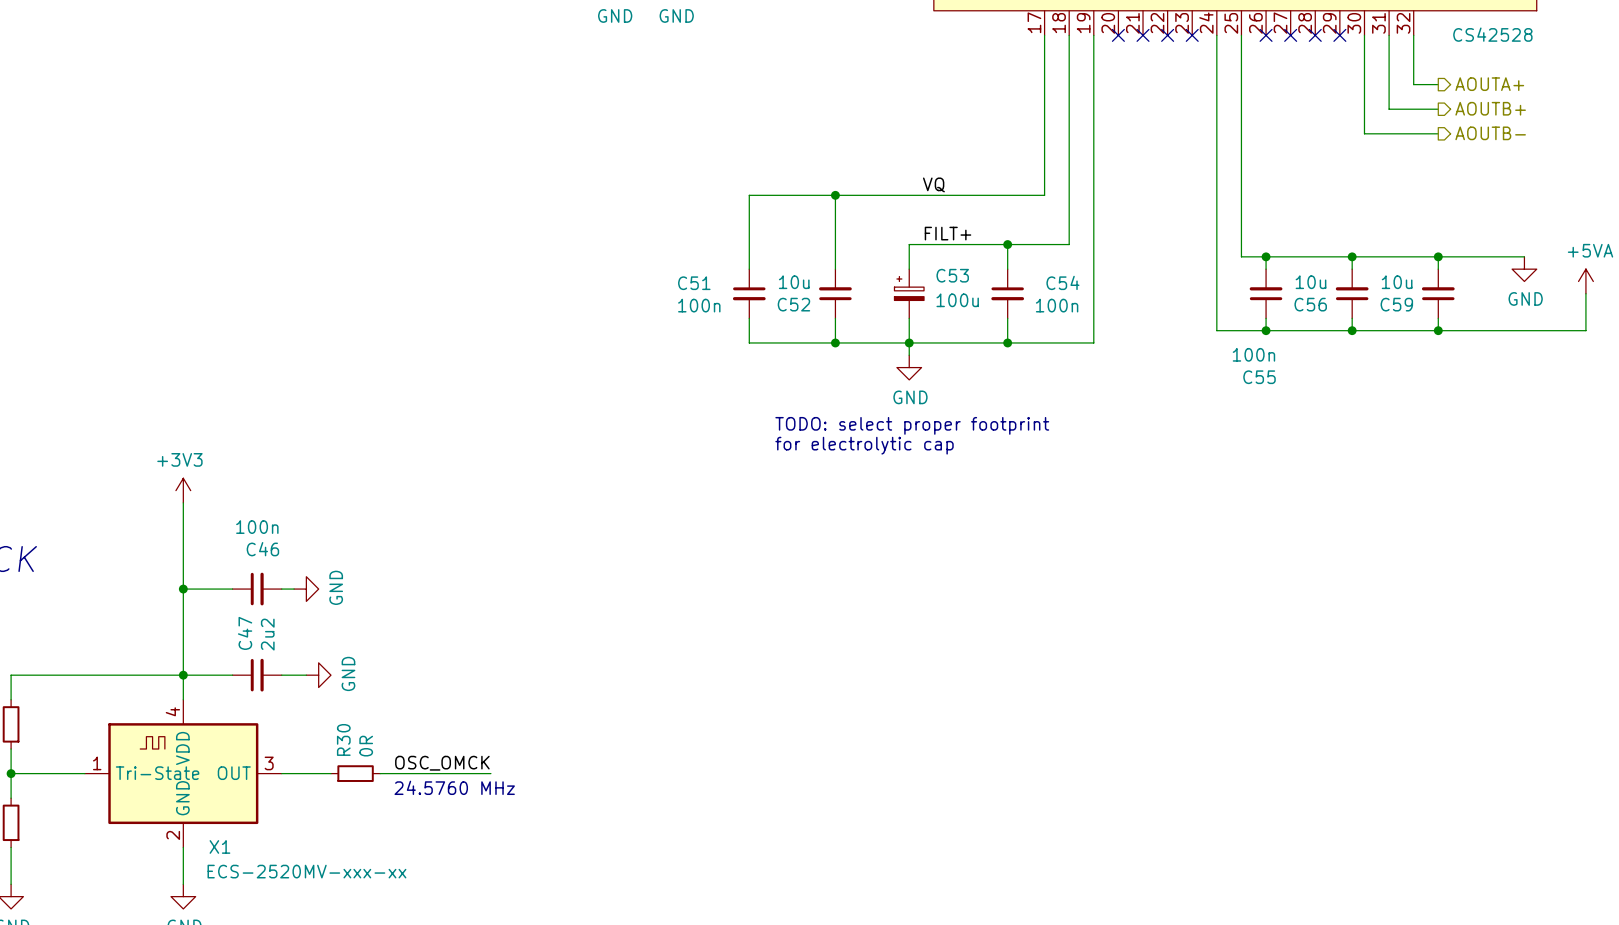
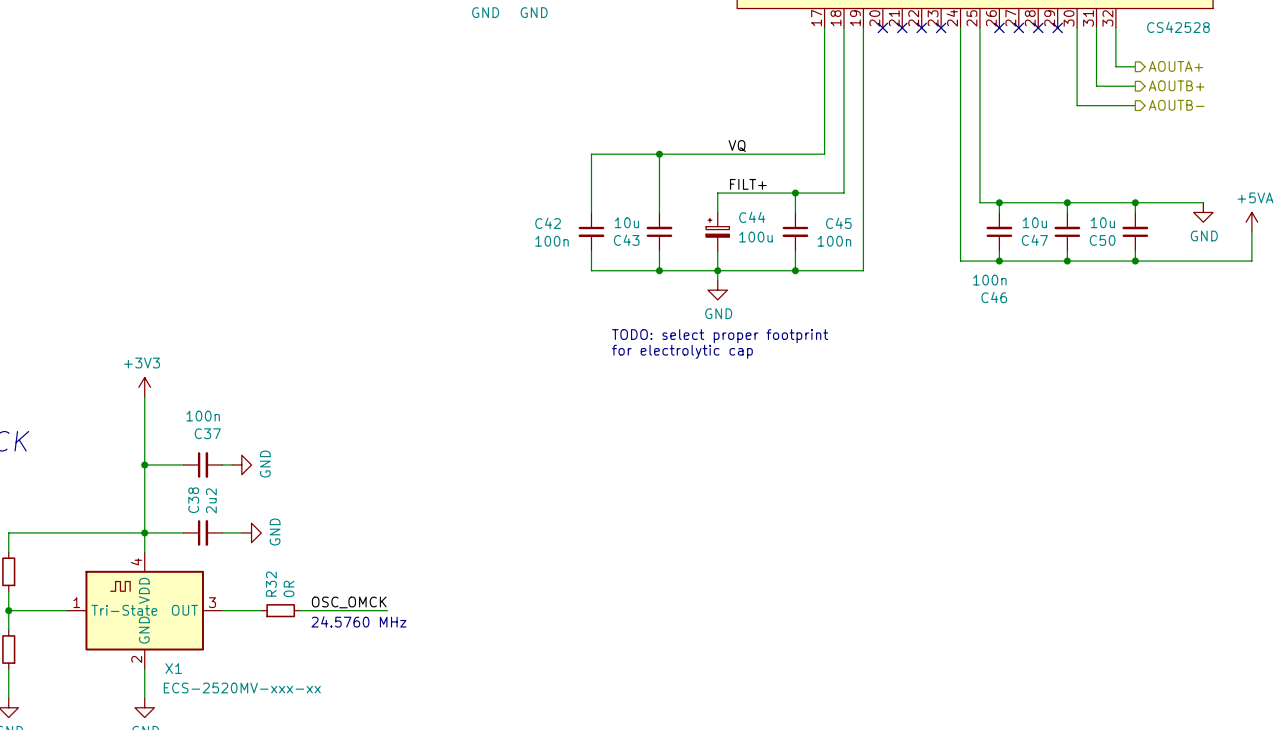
C53 name: C53 (952, 275) -> C44 (752, 217)
C54 name: C54 (1062, 282) -> C45 (838, 223)
C51 name: C51 (694, 283) -> C42 (548, 223)
C52 name: C52 (793, 304) -> C43 (626, 240)
C56 name: C56 (1310, 304) -> C47 (1034, 240)
C59 name: C59 (1396, 304) -> C50 (1102, 240)
C55 name: C55 (1259, 377) -> C46 (994, 297)
C46 name: C46 (262, 549) -> C37 (207, 433)
C47 name: C47 (245, 633) -> C38 (193, 500)
R30 name: R30 (343, 739) -> R32 (271, 584)

